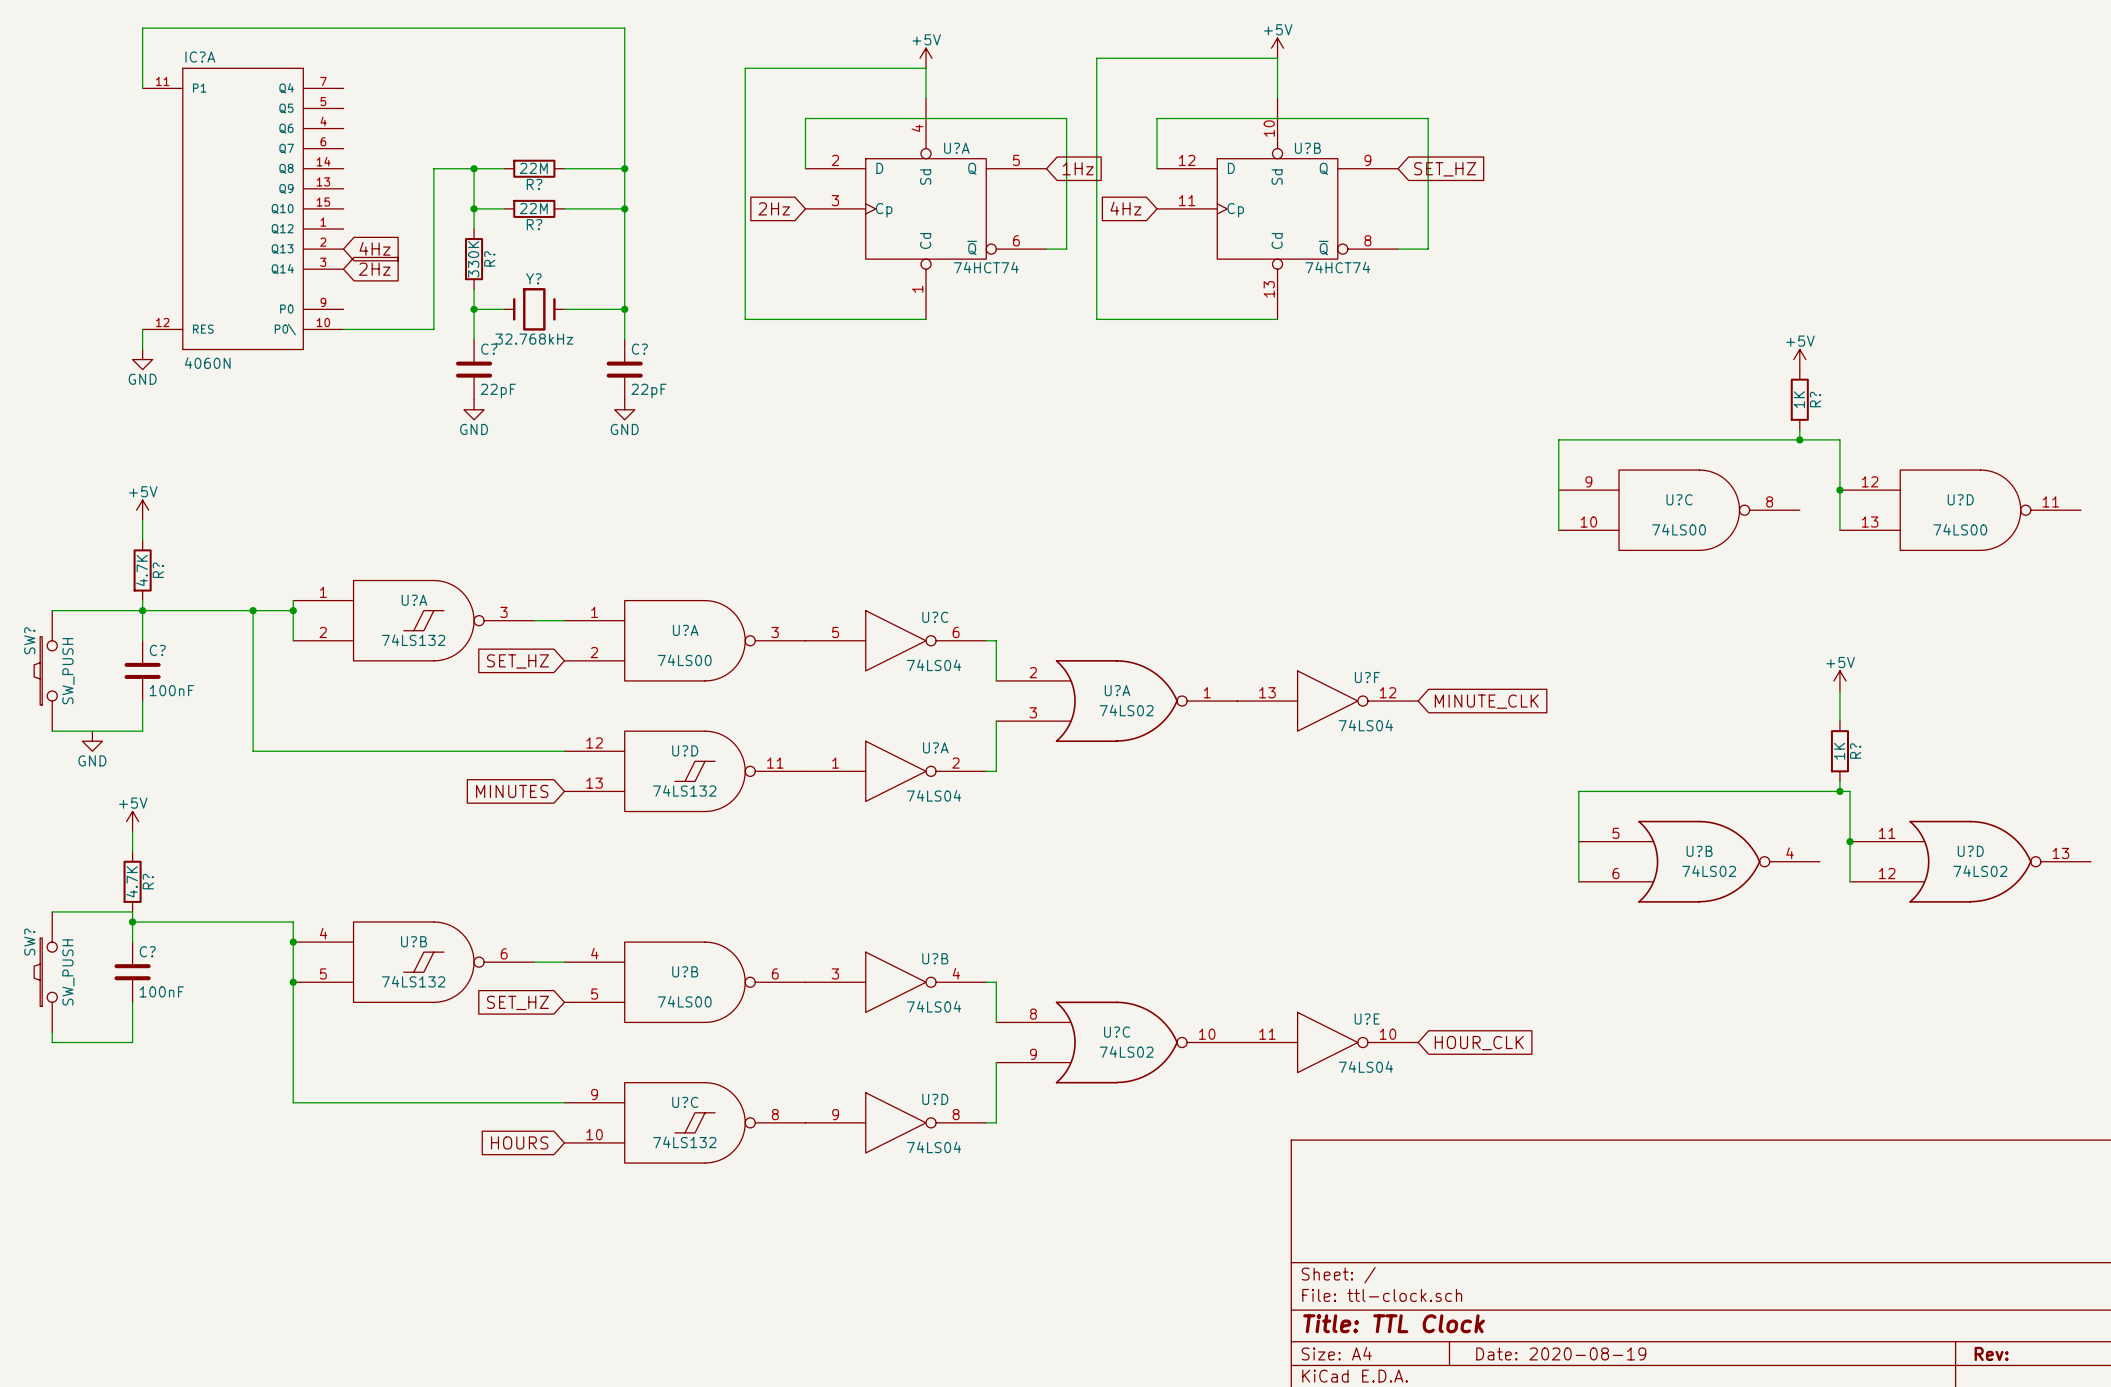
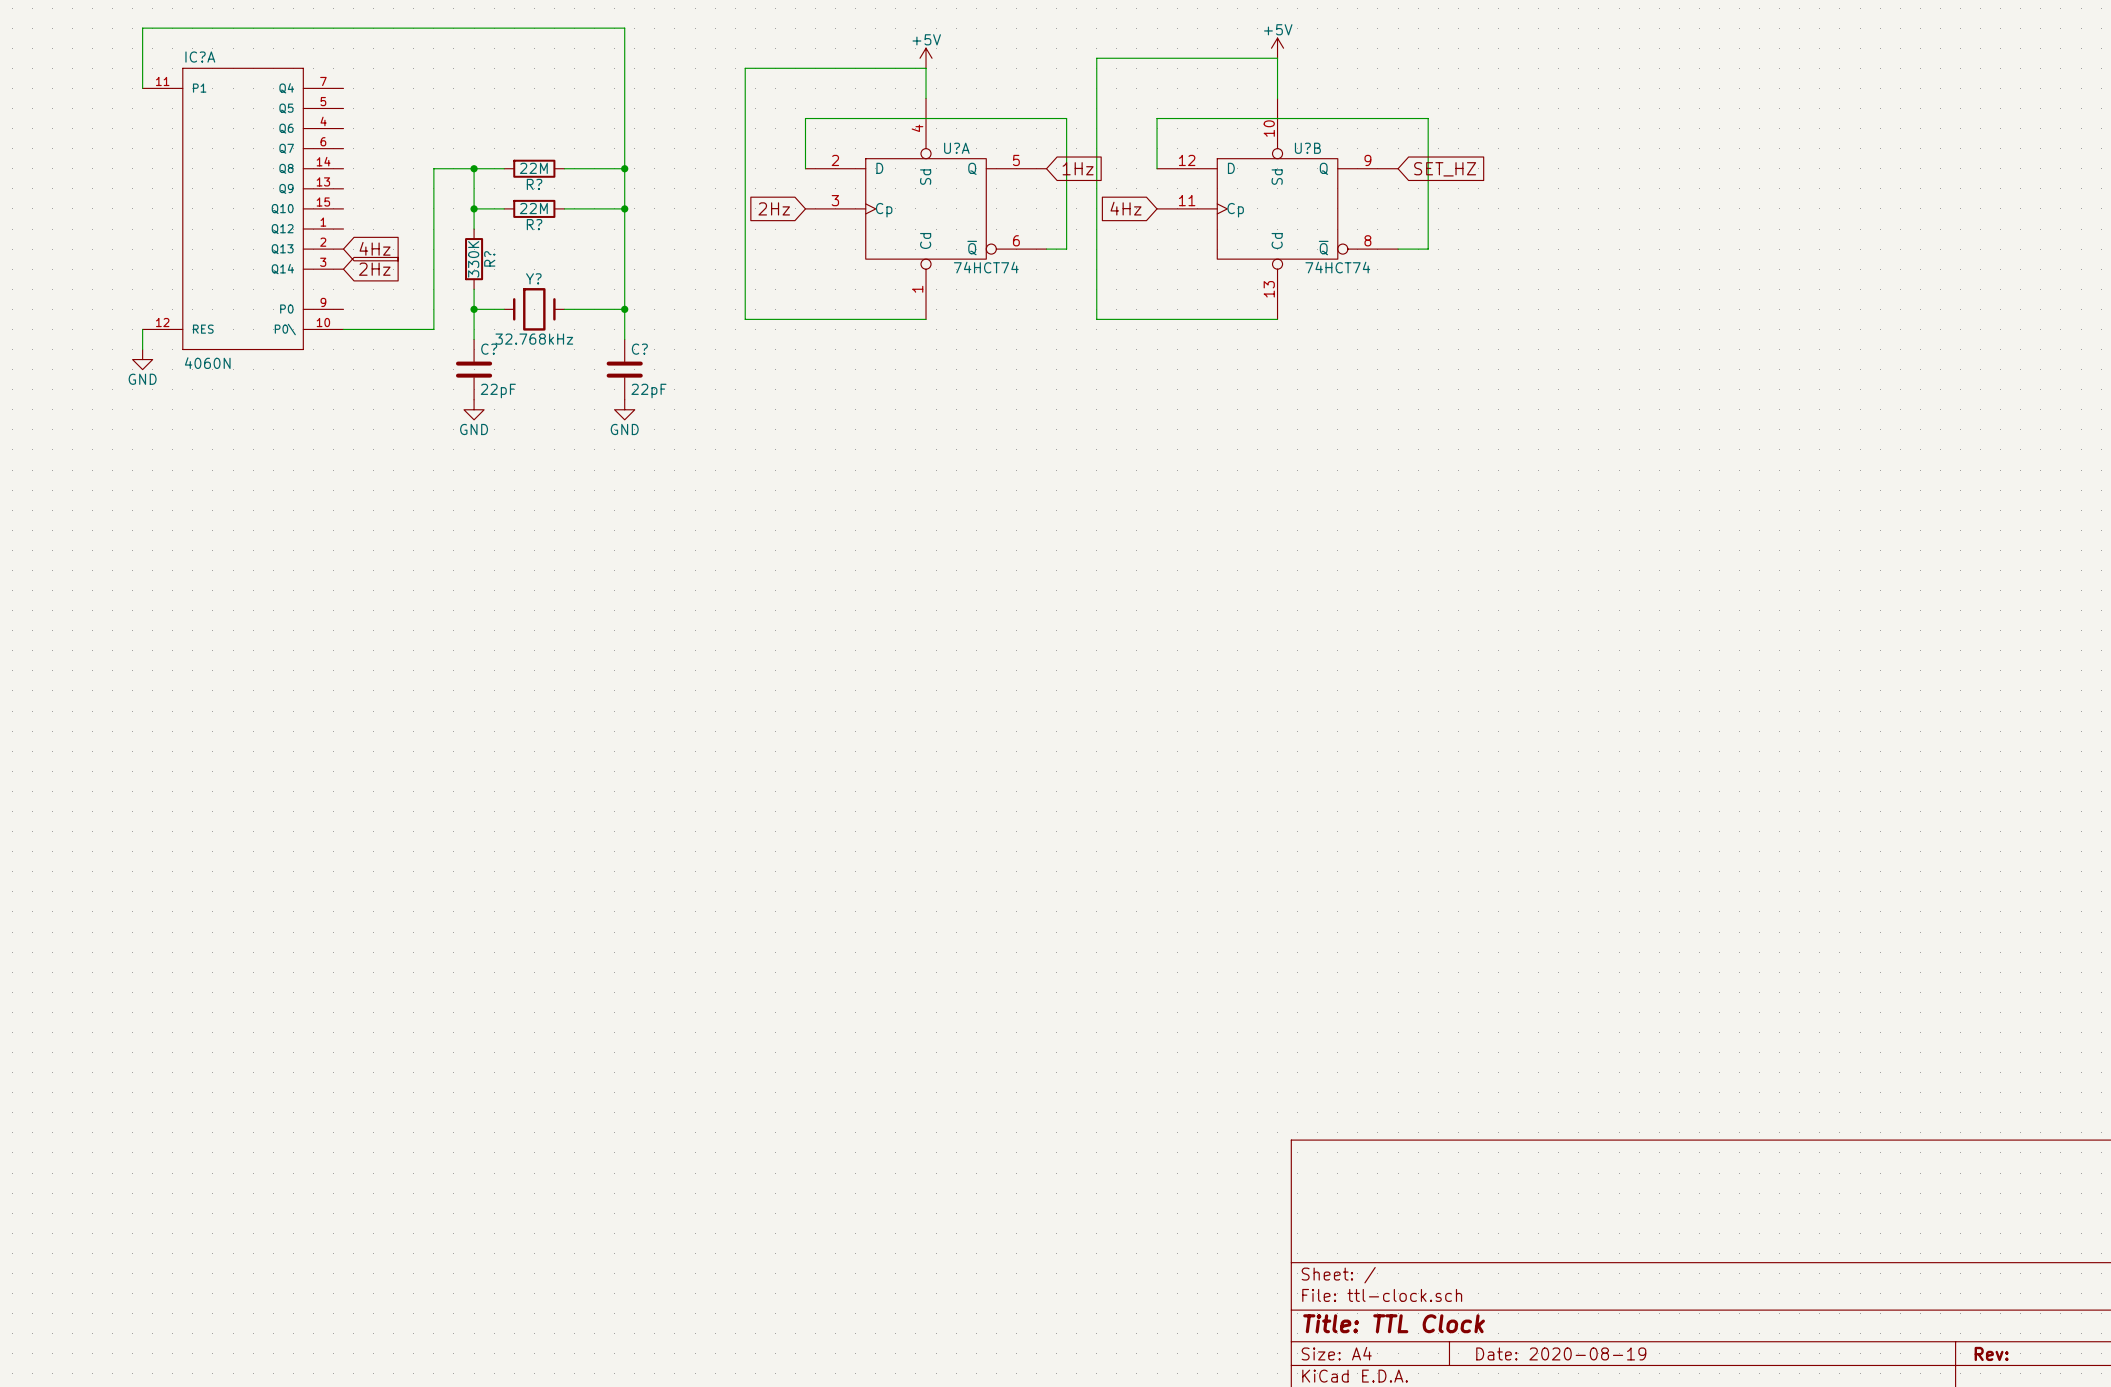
power symbol: +5V (1799, 359) -> none
R?: 1K (1799, 399) -> none
wire: (1799, 429) (1799, 439) -> none
junction: (1799, 439) -> none
junction: (1839, 490) -> none
power symbol: +5V (142, 510) -> none
U?C: 74LS00 (1679, 510) -> none
U?D: 74LS00 (1960, 510) -> none
wire: (142, 520) (142, 540) -> none
wire: (1558, 530) (1558, 439) (1839, 439) (1839, 530) -> none
R?: 4.7K (142, 570) -> none
wire: (142, 600) (142, 640) -> none
wire: (293, 600) (293, 640) -> none
wire: (52, 610) (293, 610) -> none
junction: (142, 610) -> none
wire: (253, 610) (253, 751) (564, 751) -> none
junction: (253, 610) -> none
junction: (293, 610) -> none
U?A: 74LS132 (413, 620) -> none
wire: (534, 620) (564, 620) -> none
U?A: 74LS00 (684, 640) -> none
U?C: 74LS04 (895, 640) -> none
wire: (986, 640) (996, 640) (996, 680) -> none
global label: SET_HZ (517, 661) -> none
SW?: SW_PUSH (45, 670) -> none
C?: 100nF (142, 670) -> none
power symbol: +5V (1839, 680) -> none
wire: (1839, 690) (1839, 721) -> none
wire: (142, 701) (142, 731) (52, 731) -> none
U?A: 74LS02 (1116, 701) -> none
U?F: 74LS04 (1327, 701) -> none
global label: MINUTE_CLK (1486, 701) -> none
wire: (996, 721) (996, 771) (986, 771) -> none
power symbol: GND (92, 741) -> none
R?: 1K (1839, 751) -> none
U?D: 74LS132 (684, 771) -> none
U?A: 74LS04 (895, 771) -> none
wire: (1839, 781) (1839, 791) -> none
global label: MINUTES (512, 791) -> none
junction: (1839, 791) -> none
power symbol: +5V (132, 821) -> none
wire: (132, 831) (132, 851) -> none
junction: (1850, 841) -> none
U?B: 74LS02 (1699, 861) -> none
U?D: 74LS02 (1970, 861) -> none
R?: 4.7K (132, 881) -> none
wire: (1578, 881) (1578, 791) (1850, 791) (1850, 881) -> none
wire: (52, 911) (132, 911) (132, 942) -> none
wire: (132, 921) (293, 921) (293, 1102) (564, 1102) -> none
junction: (132, 921) -> none
junction: (293, 942) -> none
U?B: 74LS132 (413, 962) -> none
wire: (534, 962) (564, 962) -> none
SW?: SW_PUSH (45, 972) -> none
C?: 100nF (132, 972) -> none
junction: (293, 982) -> none
U?B: 74LS00 (684, 982) -> none
U?B: 74LS04 (895, 982) -> none
wire: (986, 982) (996, 982) (996, 1022) -> none
wire: (132, 1002) (132, 1042) (52, 1042) (52, 1032) -> none
global label: SET_HZ (517, 1002) -> none
U?C: 74LS02 (1116, 1042) -> none
U?E: 74LS04 (1327, 1042) -> none
global label: HOUR_CLK (1479, 1043) -> none
wire: (996, 1062) (996, 1122) (986, 1122) -> none
U?C: 74LS132 (684, 1122) -> none
U?D: 74LS04 (895, 1122) -> none
global label: HOURS (519, 1142) -> none

